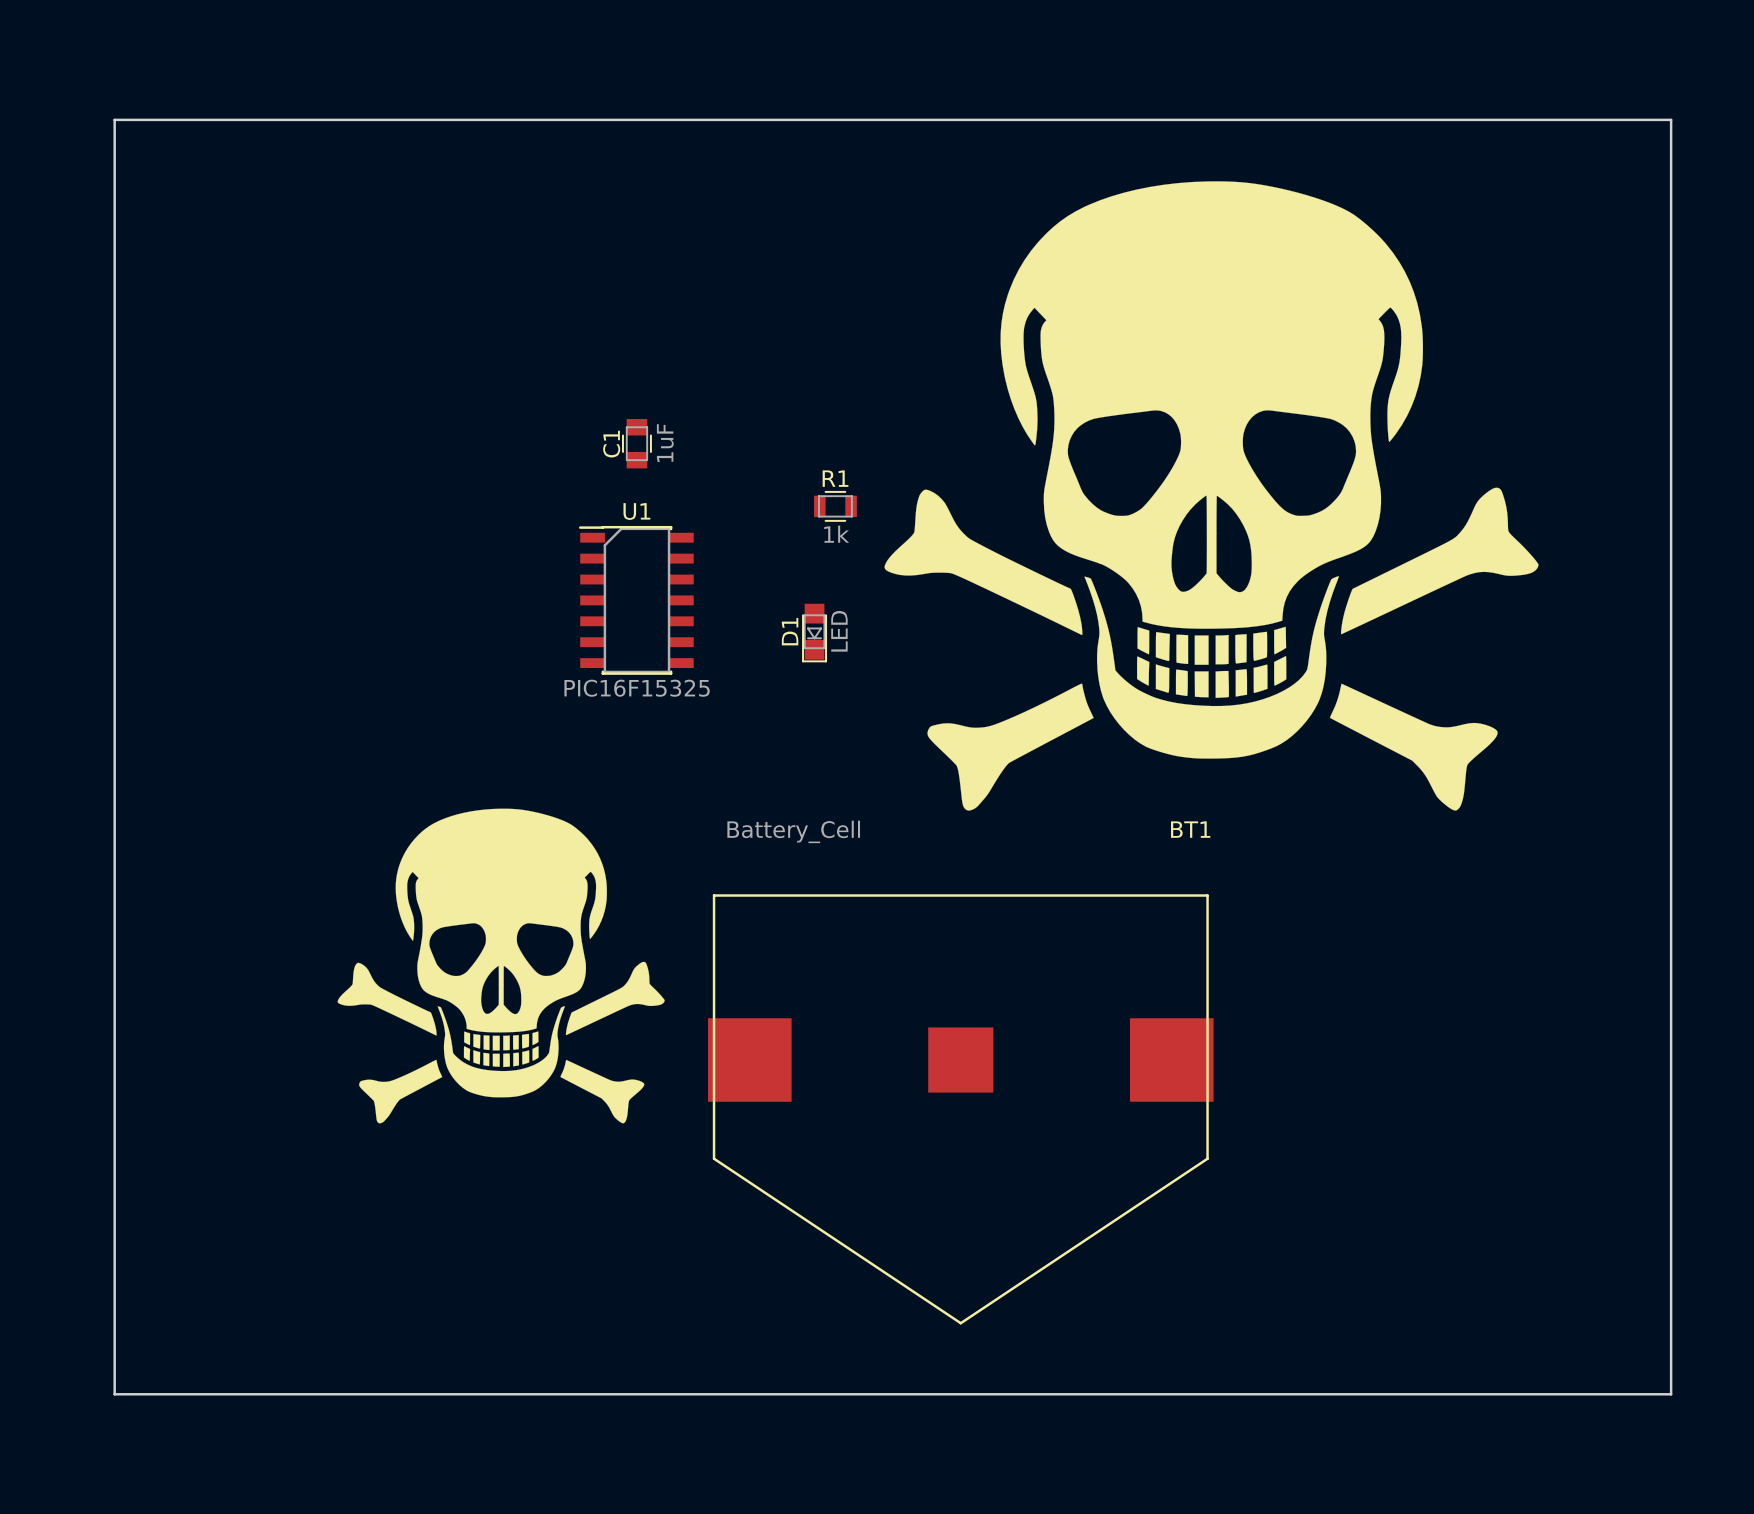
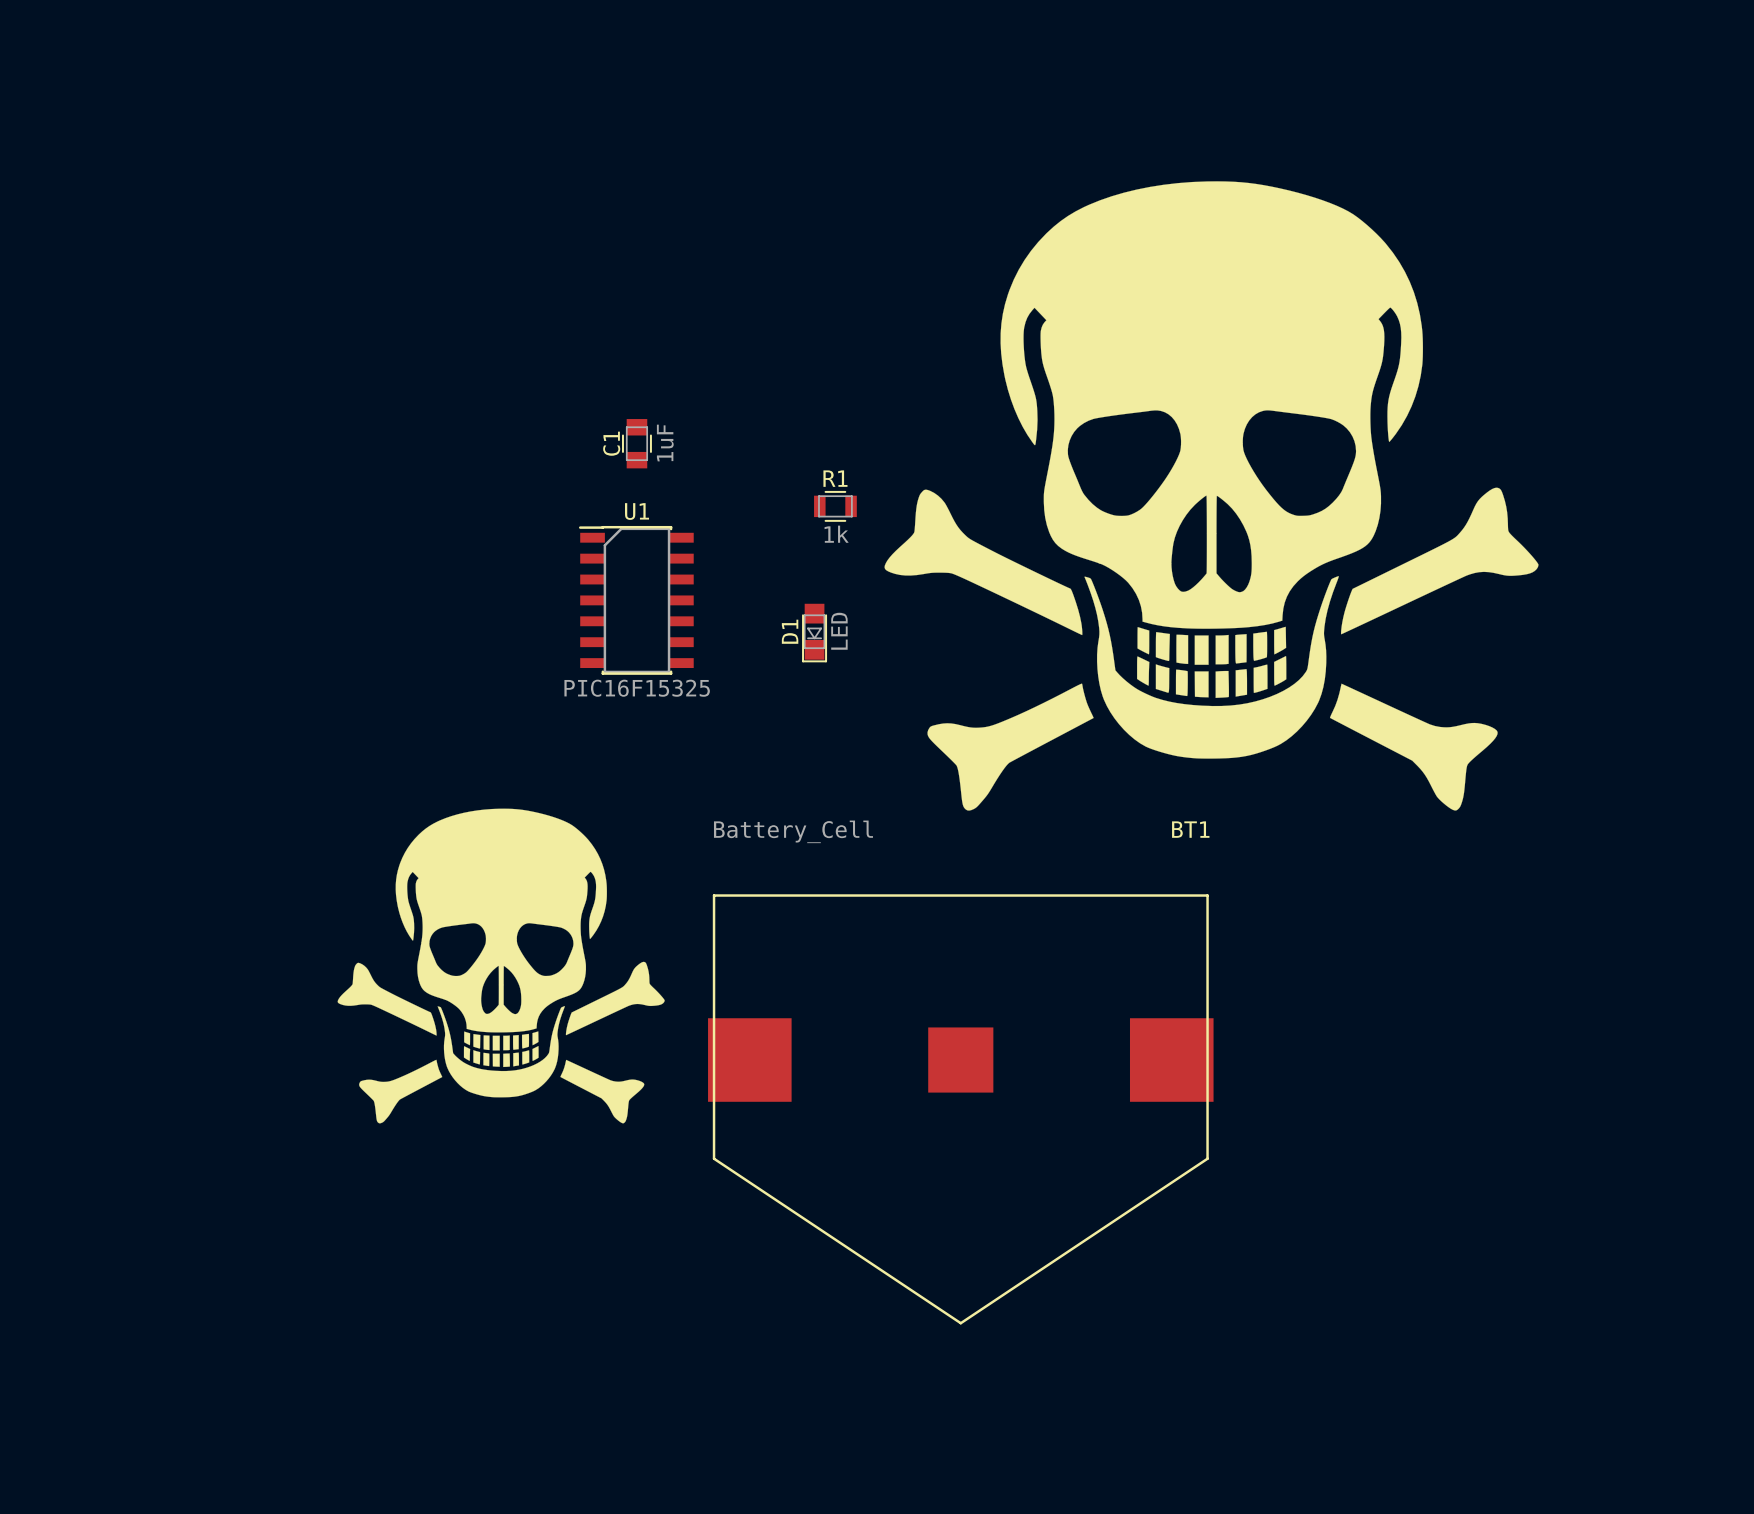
board edge: (114, 119) (1671, 119) (1671, 1394) (114, 1394) (114, 119) -> none

